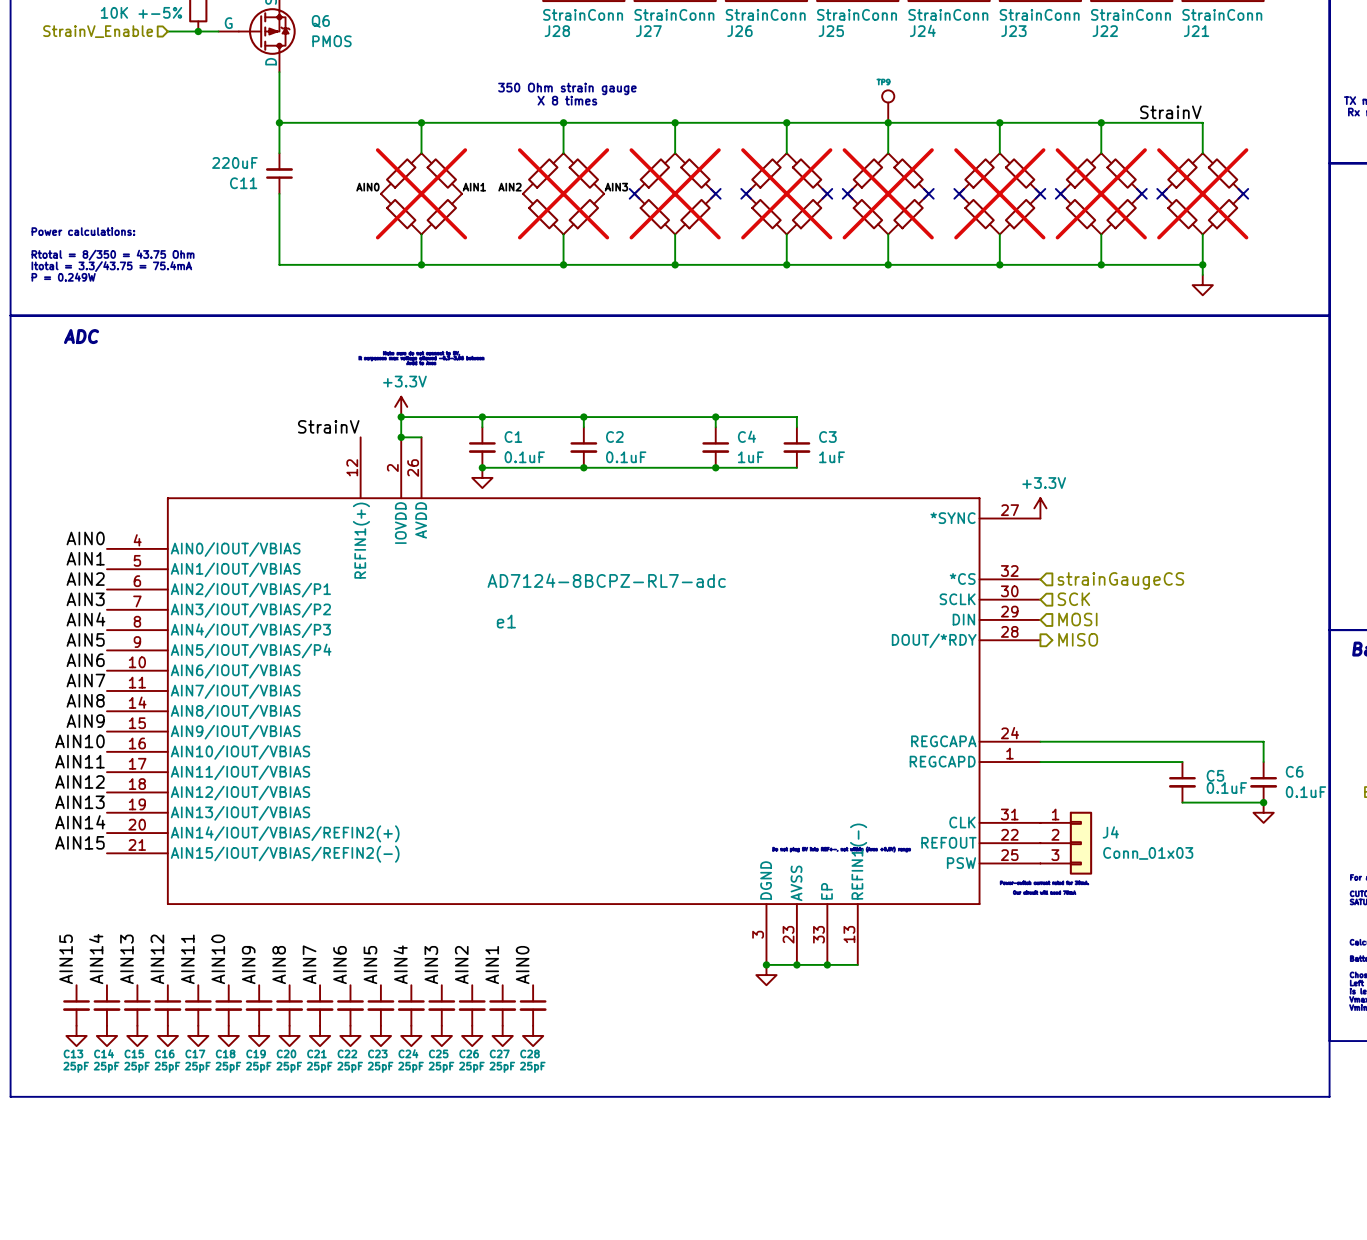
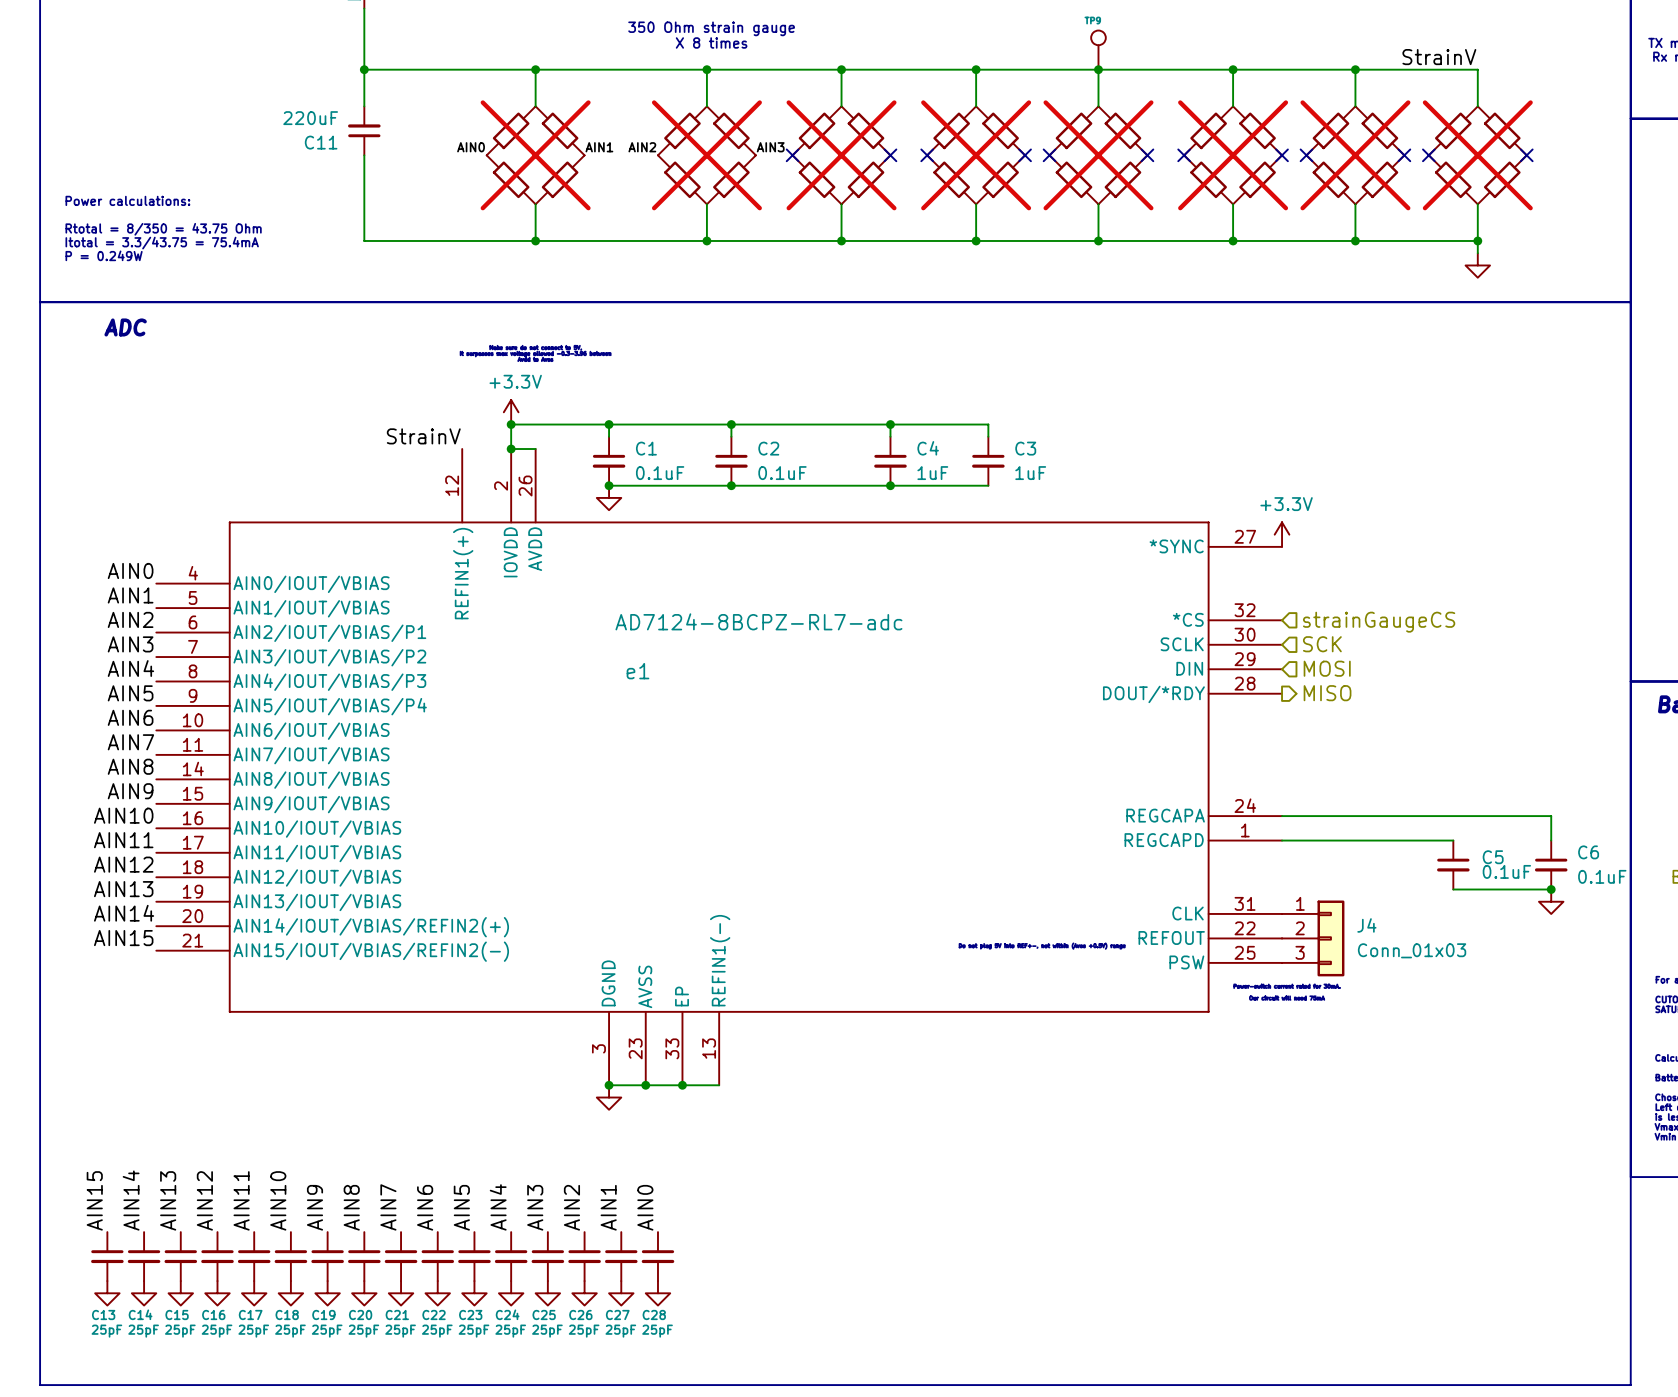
e1 symbol: [106, 437, 1041, 965] -> [156, 449, 1283, 1086]
label position: AIN15 (66, 959) -> AIN15 (94, 1200)
label position: AIN14 (96, 959) -> AIN14 (131, 1200)
label position: AIN13 (126, 959) -> AIN13 (168, 1200)
label position: AIN12 (157, 959) -> AIN12 (204, 1200)
label position: AIN11 (187, 959) -> AIN11 (241, 1200)
label position: AIN10 (218, 959) -> AIN10 (278, 1200)
label position: AIN7 (309, 964) -> AIN7 (388, 1207)
label position: AIN4 (400, 964) -> AIN4 (498, 1207)
wire: none -> (609, 1085) (719, 1085)
junction: none -> (609, 1085)
junction: none -> (645, 1085)
junction: none -> (682, 1085)
wire: (766, 964) (857, 964) -> none
junction: (766, 964) -> none
junction: (796, 964) -> none
junction: (827, 964) -> none
label position: AIN9 (248, 965) -> AIN9 (315, 1207)
label position: AIN8 (279, 965) -> AIN8 (351, 1207)
label position: AIN6 (340, 965) -> AIN6 (425, 1207)
label position: AIN5 (370, 965) -> AIN5 (461, 1207)
label position: AIN3 (431, 965) -> AIN3 (535, 1207)
label position: AIN2 (461, 965) -> AIN2 (571, 1207)
label position: AIN1 (492, 965) -> AIN1 (608, 1207)
label position: AIN0 (522, 965) -> AIN0 (645, 1207)
power symbol: none -> (609, 1097)
power symbol: (766, 975) -> none
C13 position: (76, 1005) -> (107, 1256)
C14 position: (106, 1005) -> (144, 1256)
C15 position: (137, 1005) -> (180, 1256)
C16 position: (167, 1005) -> (217, 1256)
C17 position: (198, 1005) -> (254, 1256)
C18 position: (228, 1005) -> (290, 1256)
C19 position: (259, 1005) -> (327, 1256)
C20 position: (289, 1005) -> (364, 1256)
C21 position: (320, 1005) -> (401, 1256)
C22 position: (350, 1005) -> (437, 1256)
C23 position: (380, 1005) -> (474, 1256)
C24 position: (411, 1005) -> (511, 1256)
C25 position: (441, 1005) -> (547, 1256)
C26 position: (472, 1005) -> (584, 1256)
C27 position: (502, 1005) -> (621, 1256)
C28 position: (533, 1005) -> (657, 1256)
power symbol: (76, 1035) -> none
power symbol: (106, 1035) -> none
power symbol: (137, 1035) -> none
power symbol: (167, 1035) -> none
power symbol: (198, 1035) -> none
power symbol: (228, 1035) -> none
power symbol: (259, 1035) -> none
power symbol: (289, 1035) -> none
power symbol: (320, 1035) -> none
power symbol: (350, 1035) -> none
power symbol: (380, 1035) -> none
power symbol: (411, 1035) -> none
power symbol: (441, 1035) -> none
power symbol: (472, 1035) -> none
power symbol: (502, 1035) -> none
power symbol: (533, 1035) -> none
line: (10, 1096) (1329, 1096) -> (40, 1244) (40, 1385) (1630, 1385) (1630, 1244)
power symbol: none -> (107, 1293)
power symbol: none -> (144, 1293)
power symbol: none -> (180, 1293)
power symbol: none -> (217, 1293)
power symbol: none -> (254, 1293)
power symbol: none -> (290, 1293)
power symbol: none -> (327, 1293)
power symbol: none -> (364, 1293)
power symbol: none -> (401, 1293)
power symbol: none -> (437, 1293)
power symbol: none -> (474, 1293)
power symbol: none -> (511, 1293)
power symbol: none -> (547, 1293)
power symbol: none -> (584, 1293)
power symbol: none -> (621, 1293)
power symbol: none -> (657, 1293)

